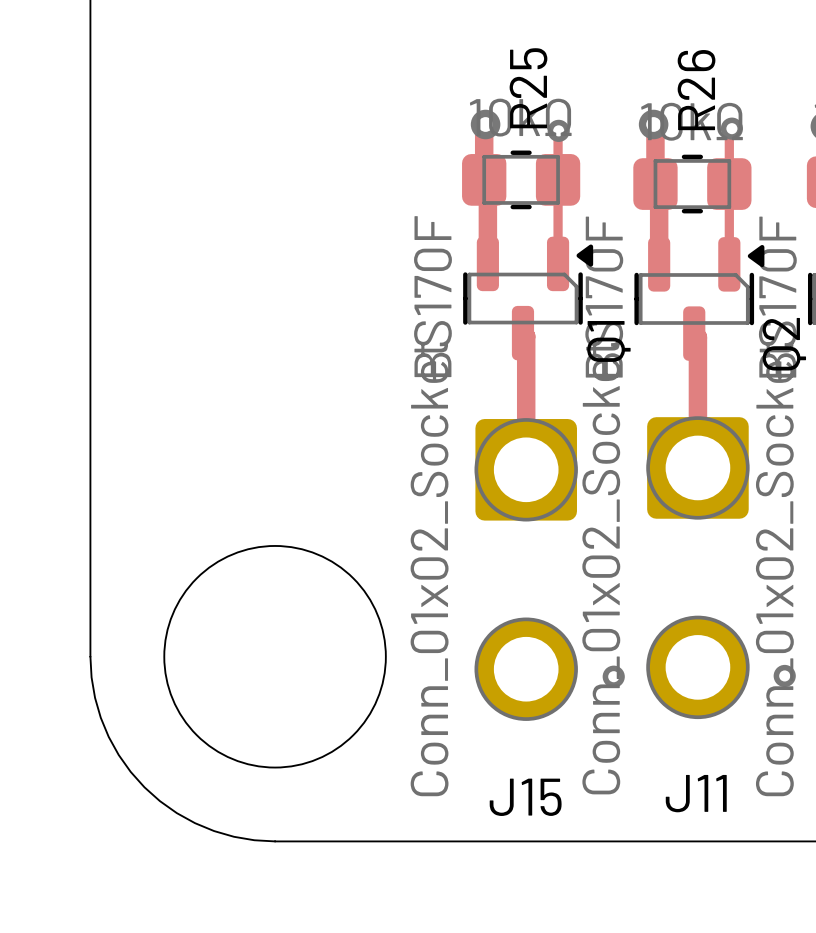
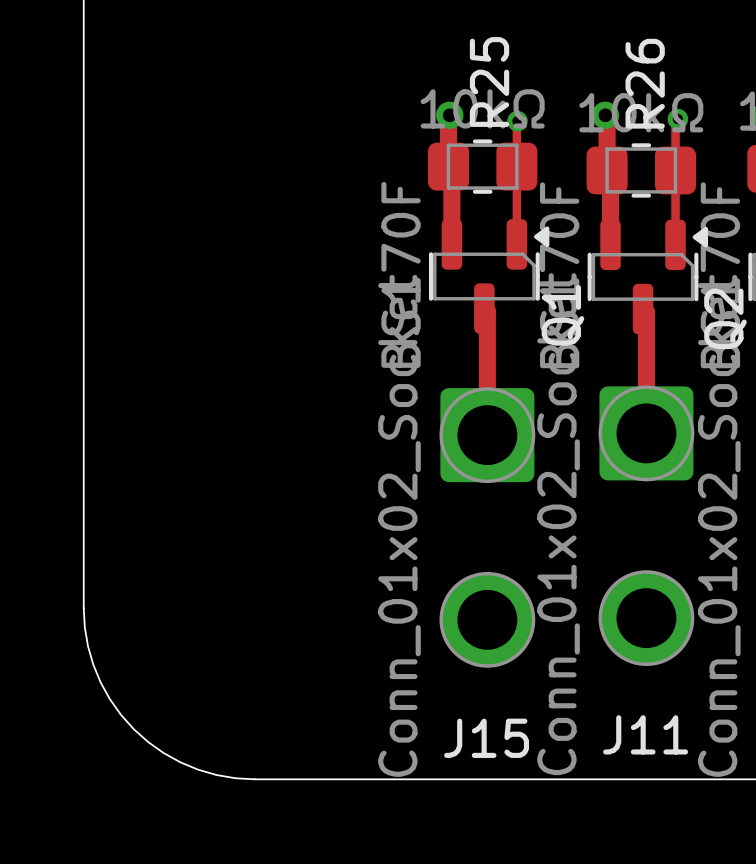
round board edge: [163, 545, 387, 769] -> none
via: (784, 675) -> none
via: (613, 676) -> none

